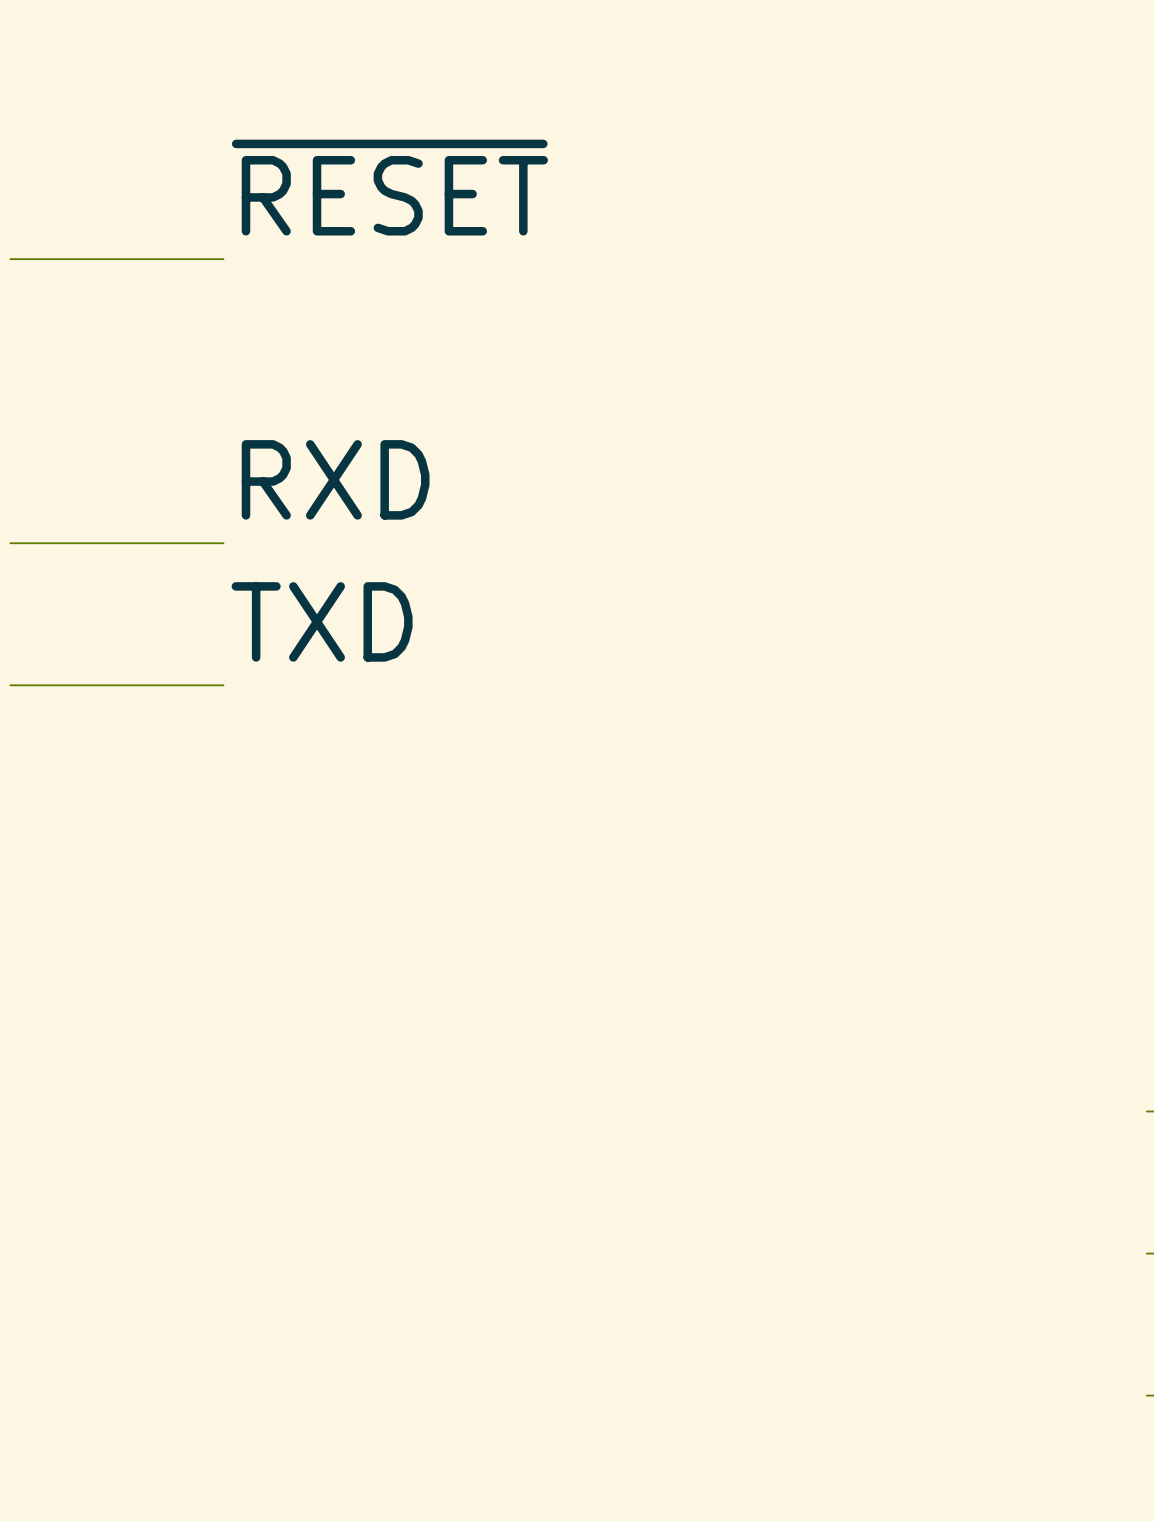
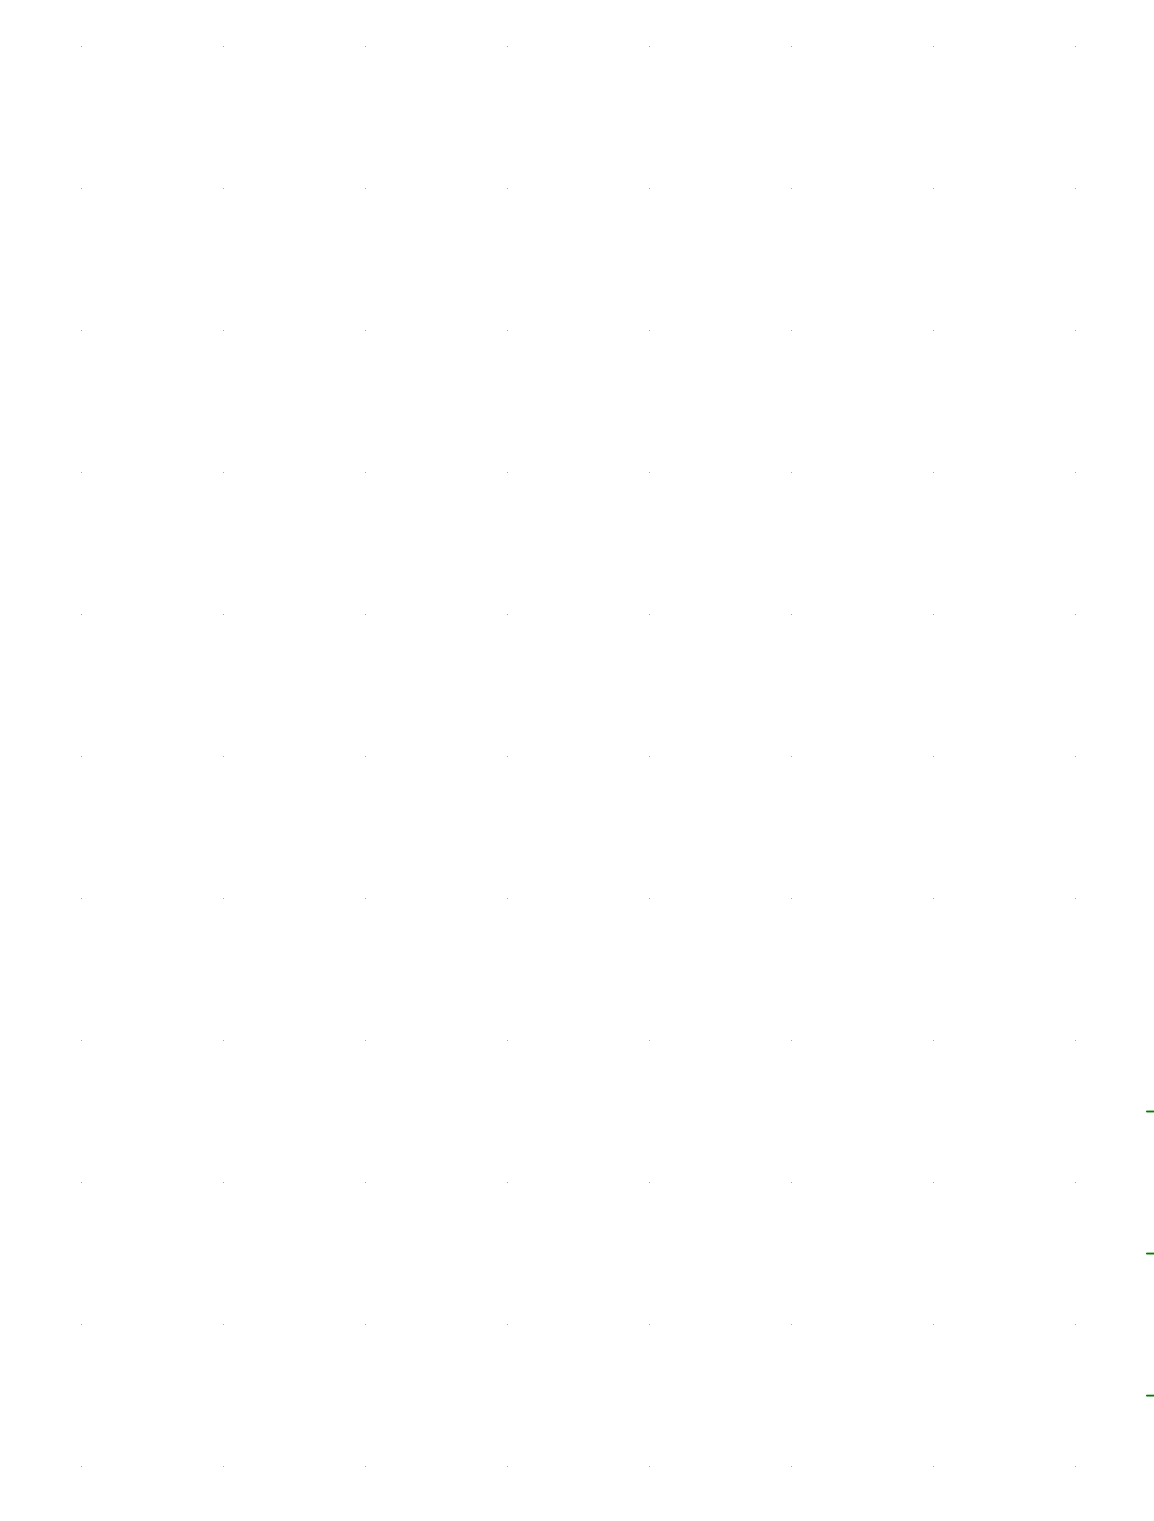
label: ~{RESET} (389, 187) -> none
wire: (10, 259) (223, 259) -> none
label: RXD (335, 479) -> none
wire: (10, 543) (223, 543) -> none
label: TXD (322, 621) -> none
wire: (10, 685) (223, 685) -> none

